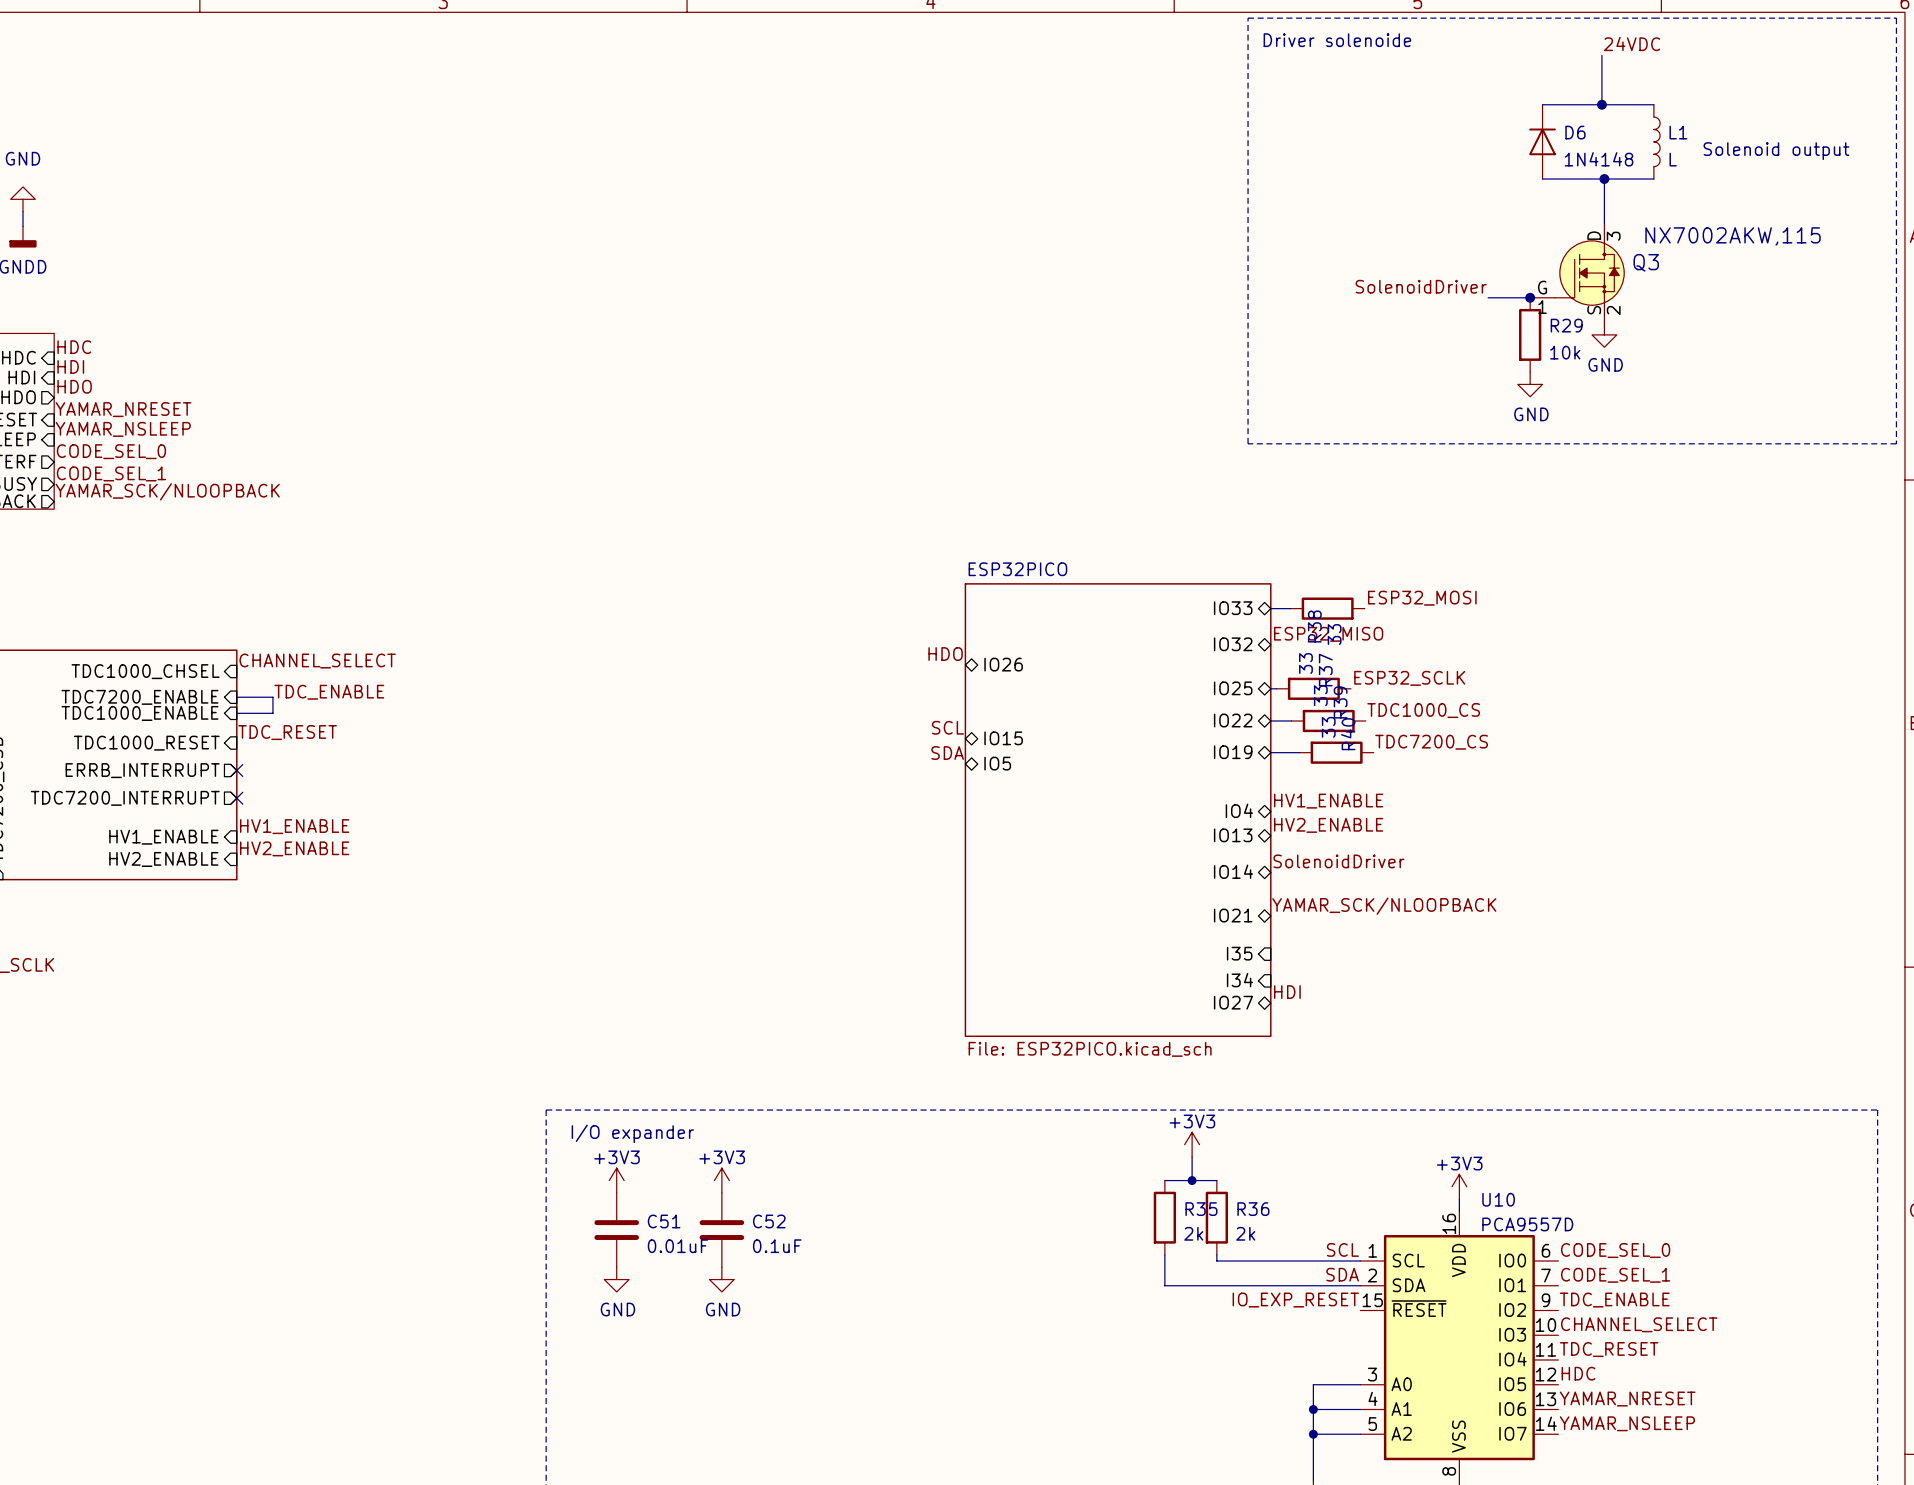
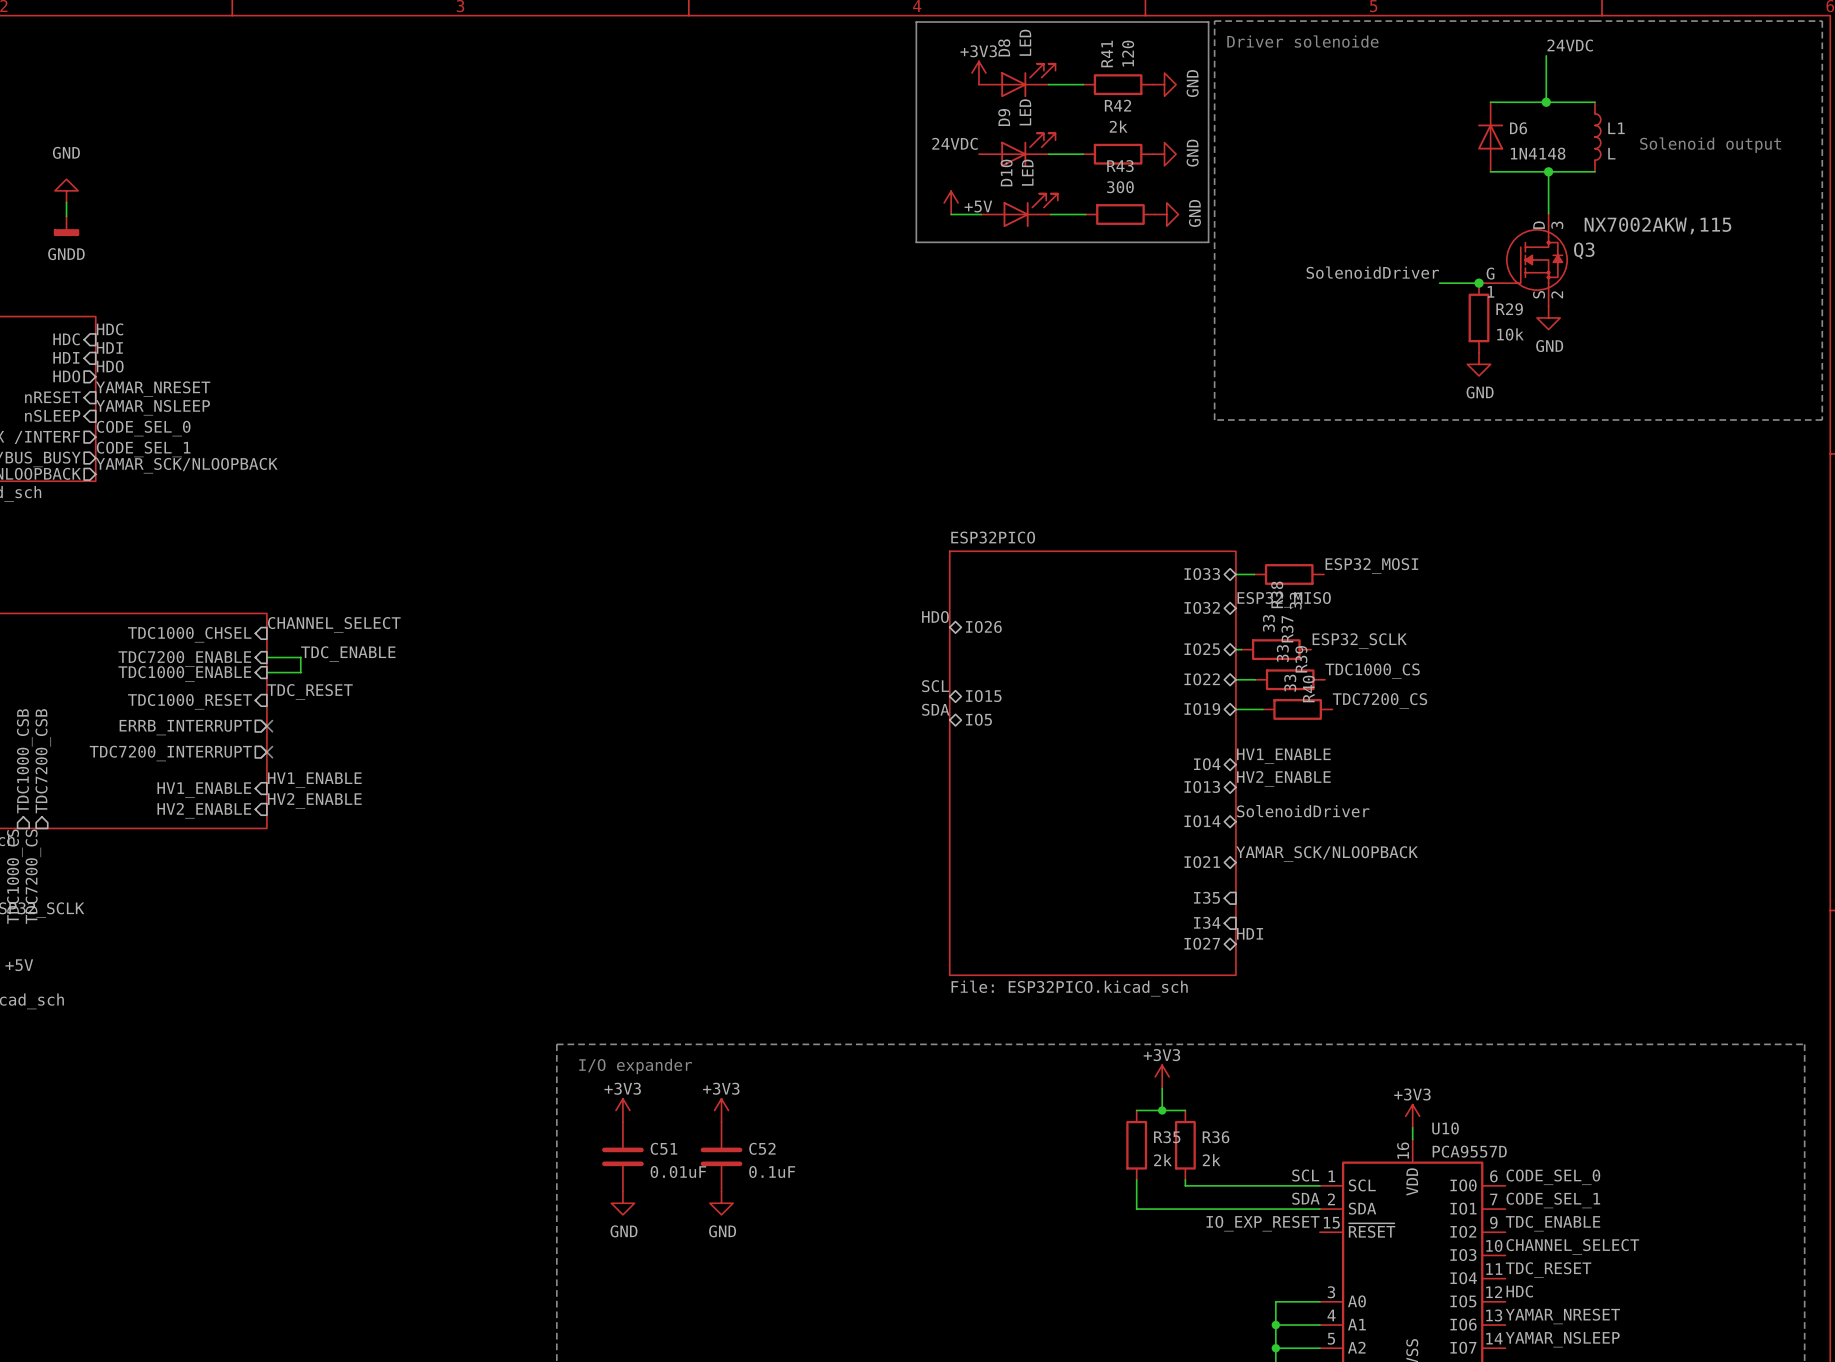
line: none -> (916, 22) (916, 242) (1208, 242) (1208, 22) (916, 22)
power symbol: none -> +3V3 (978, 73)
D8: none -> LED (1017, 80)
wire: none -> (1048, 84) (1083, 84)
R41: none -> 120 (1118, 84)
power symbol: none -> GND (1164, 84)
label: none -> 24VDC (954, 143)
D9: none -> LED (1017, 150)
wire: none -> (1048, 154) (1083, 154)
R42: none -> 2k (1118, 154)
power symbol: none -> GND (1164, 154)
power symbol: none -> +5V (951, 202)
D10: none -> LED (1019, 210)
wire: none -> (951, 214) (981, 214)
wire: none -> (1050, 214) (1085, 214)
R43: none -> 300 (1120, 214)
power symbol: none -> GND (1166, 214)

